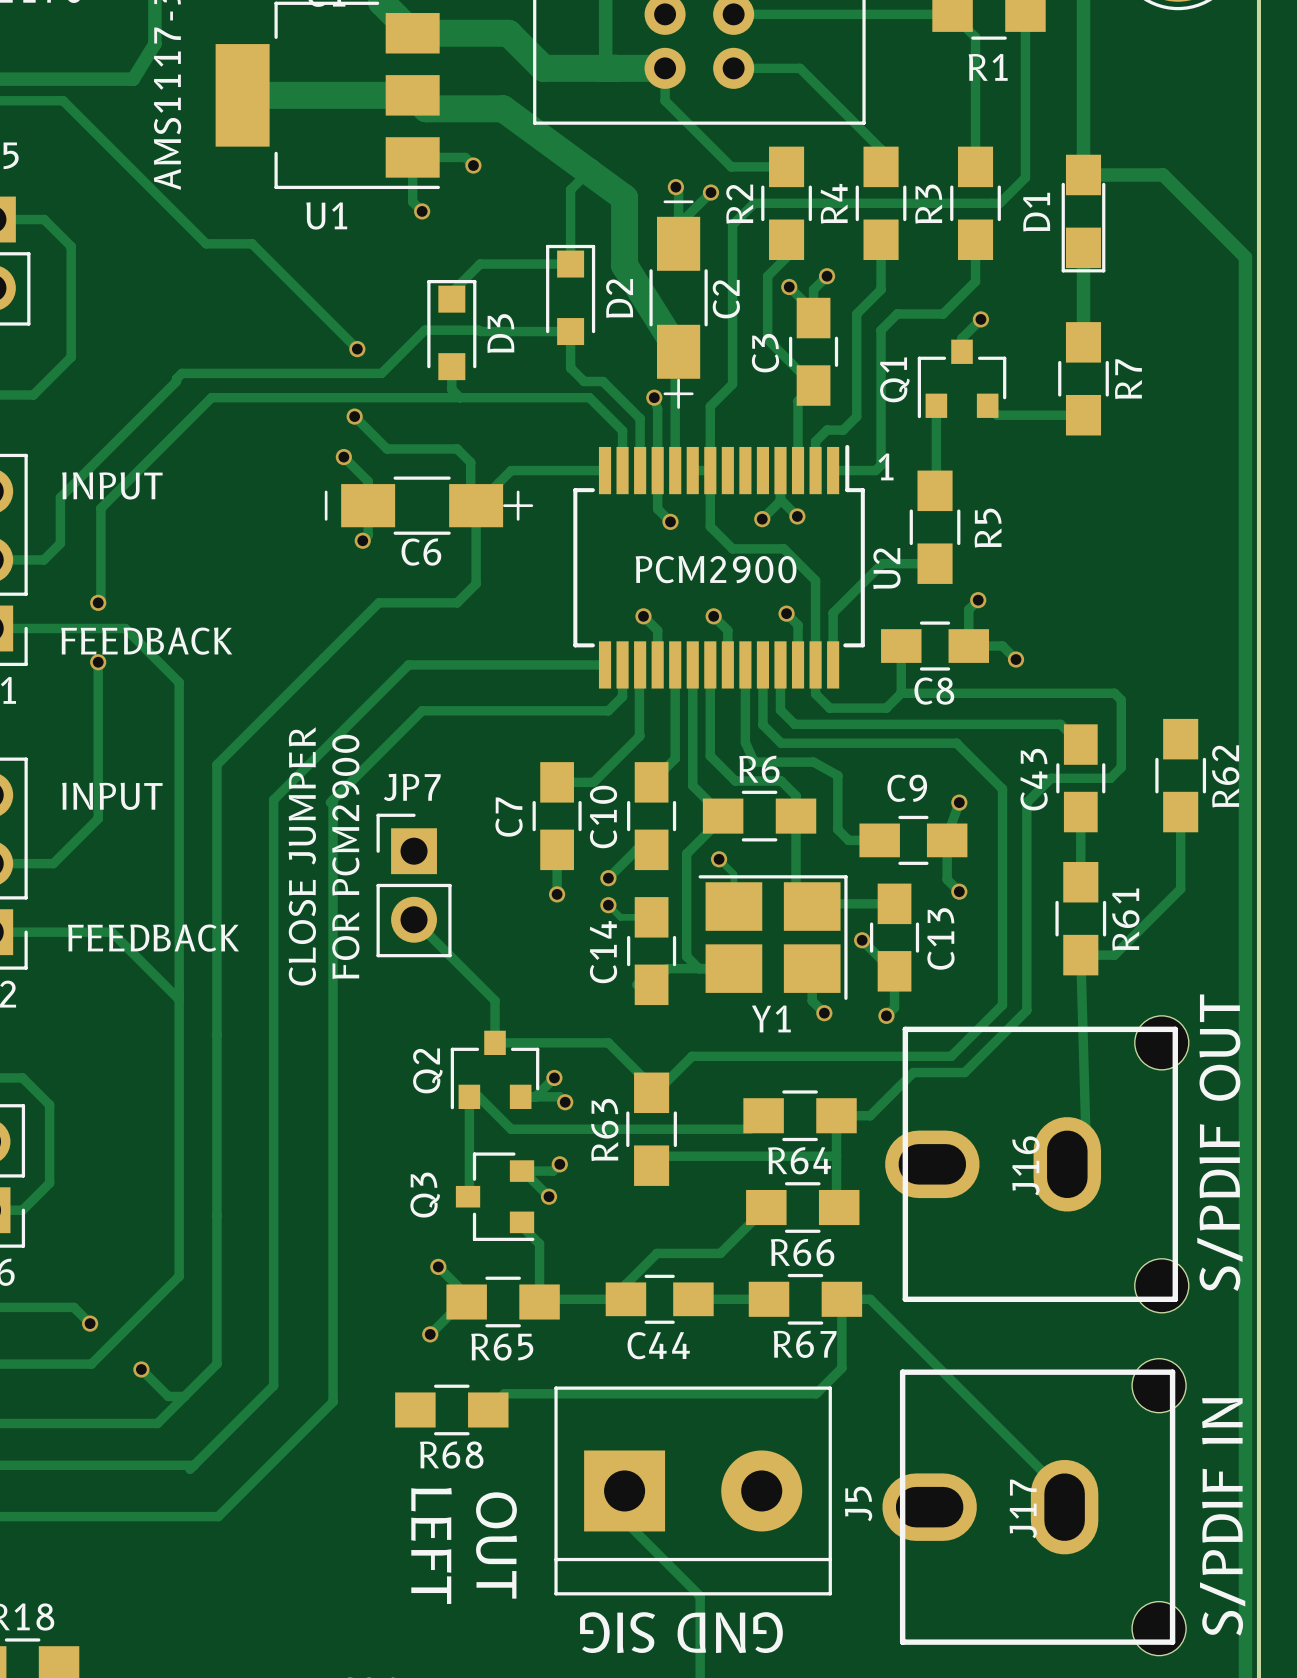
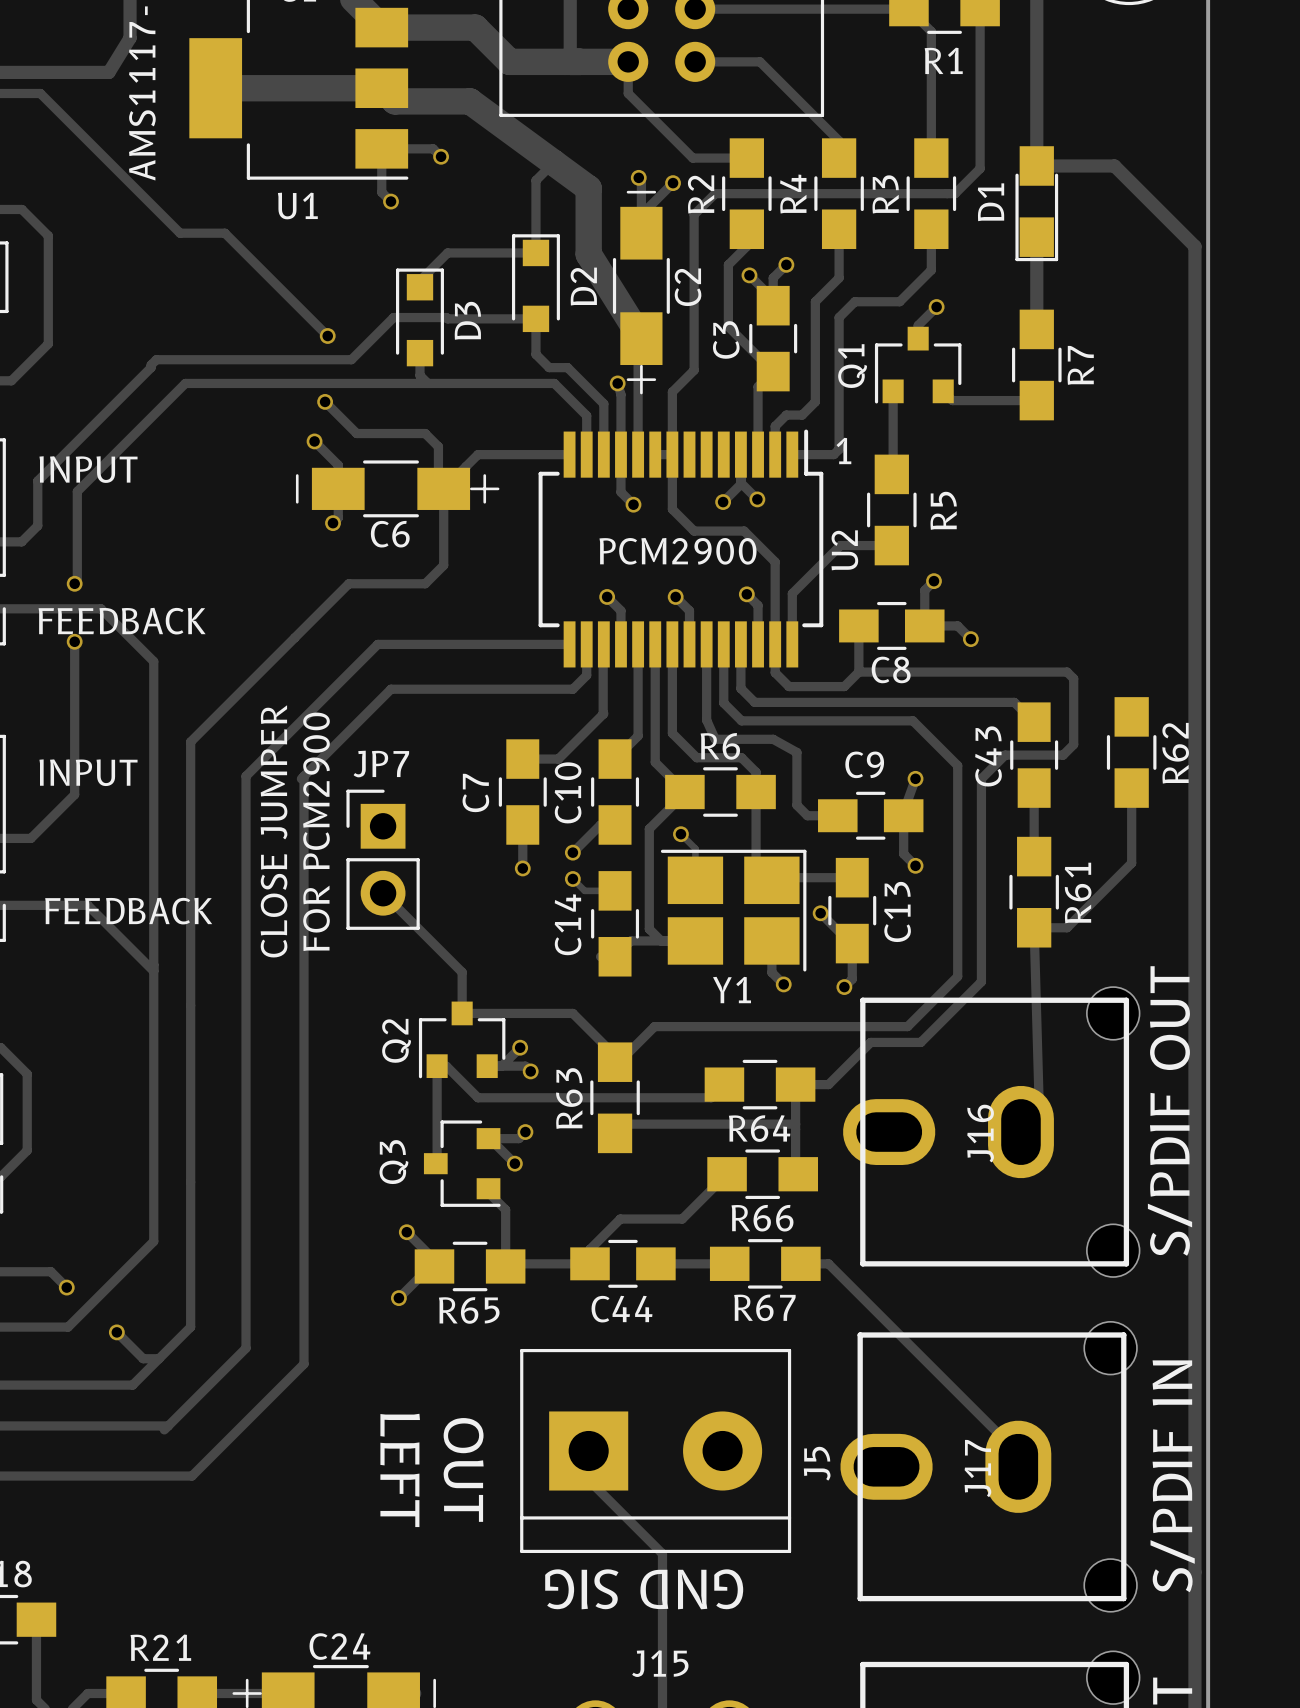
track: (841, 1299) (841, 1368) (816, 1393) (504, 1393) (488, 1409) -> none
R68: (451, 1409) -> none
text position: LEFT (431, 1545) -> LEFT (400, 1470)
text position: OUT (496, 1545) -> OUT (463, 1469)

